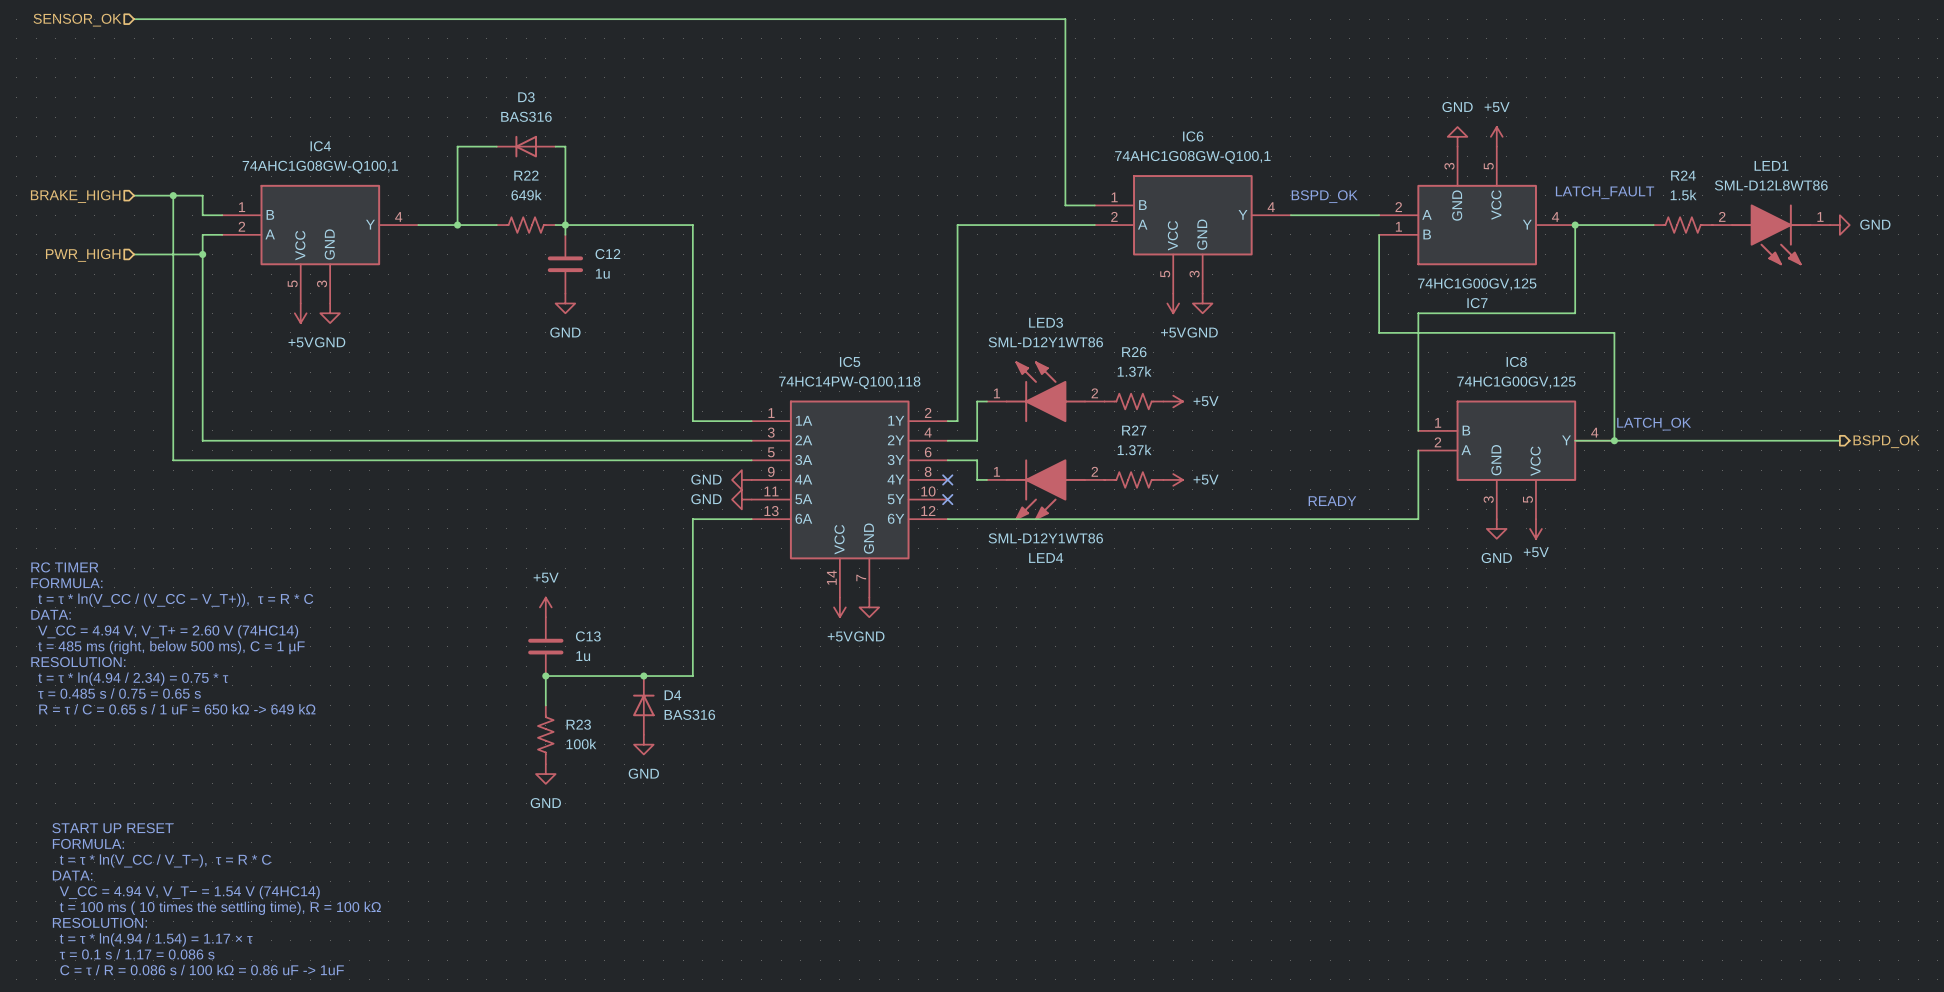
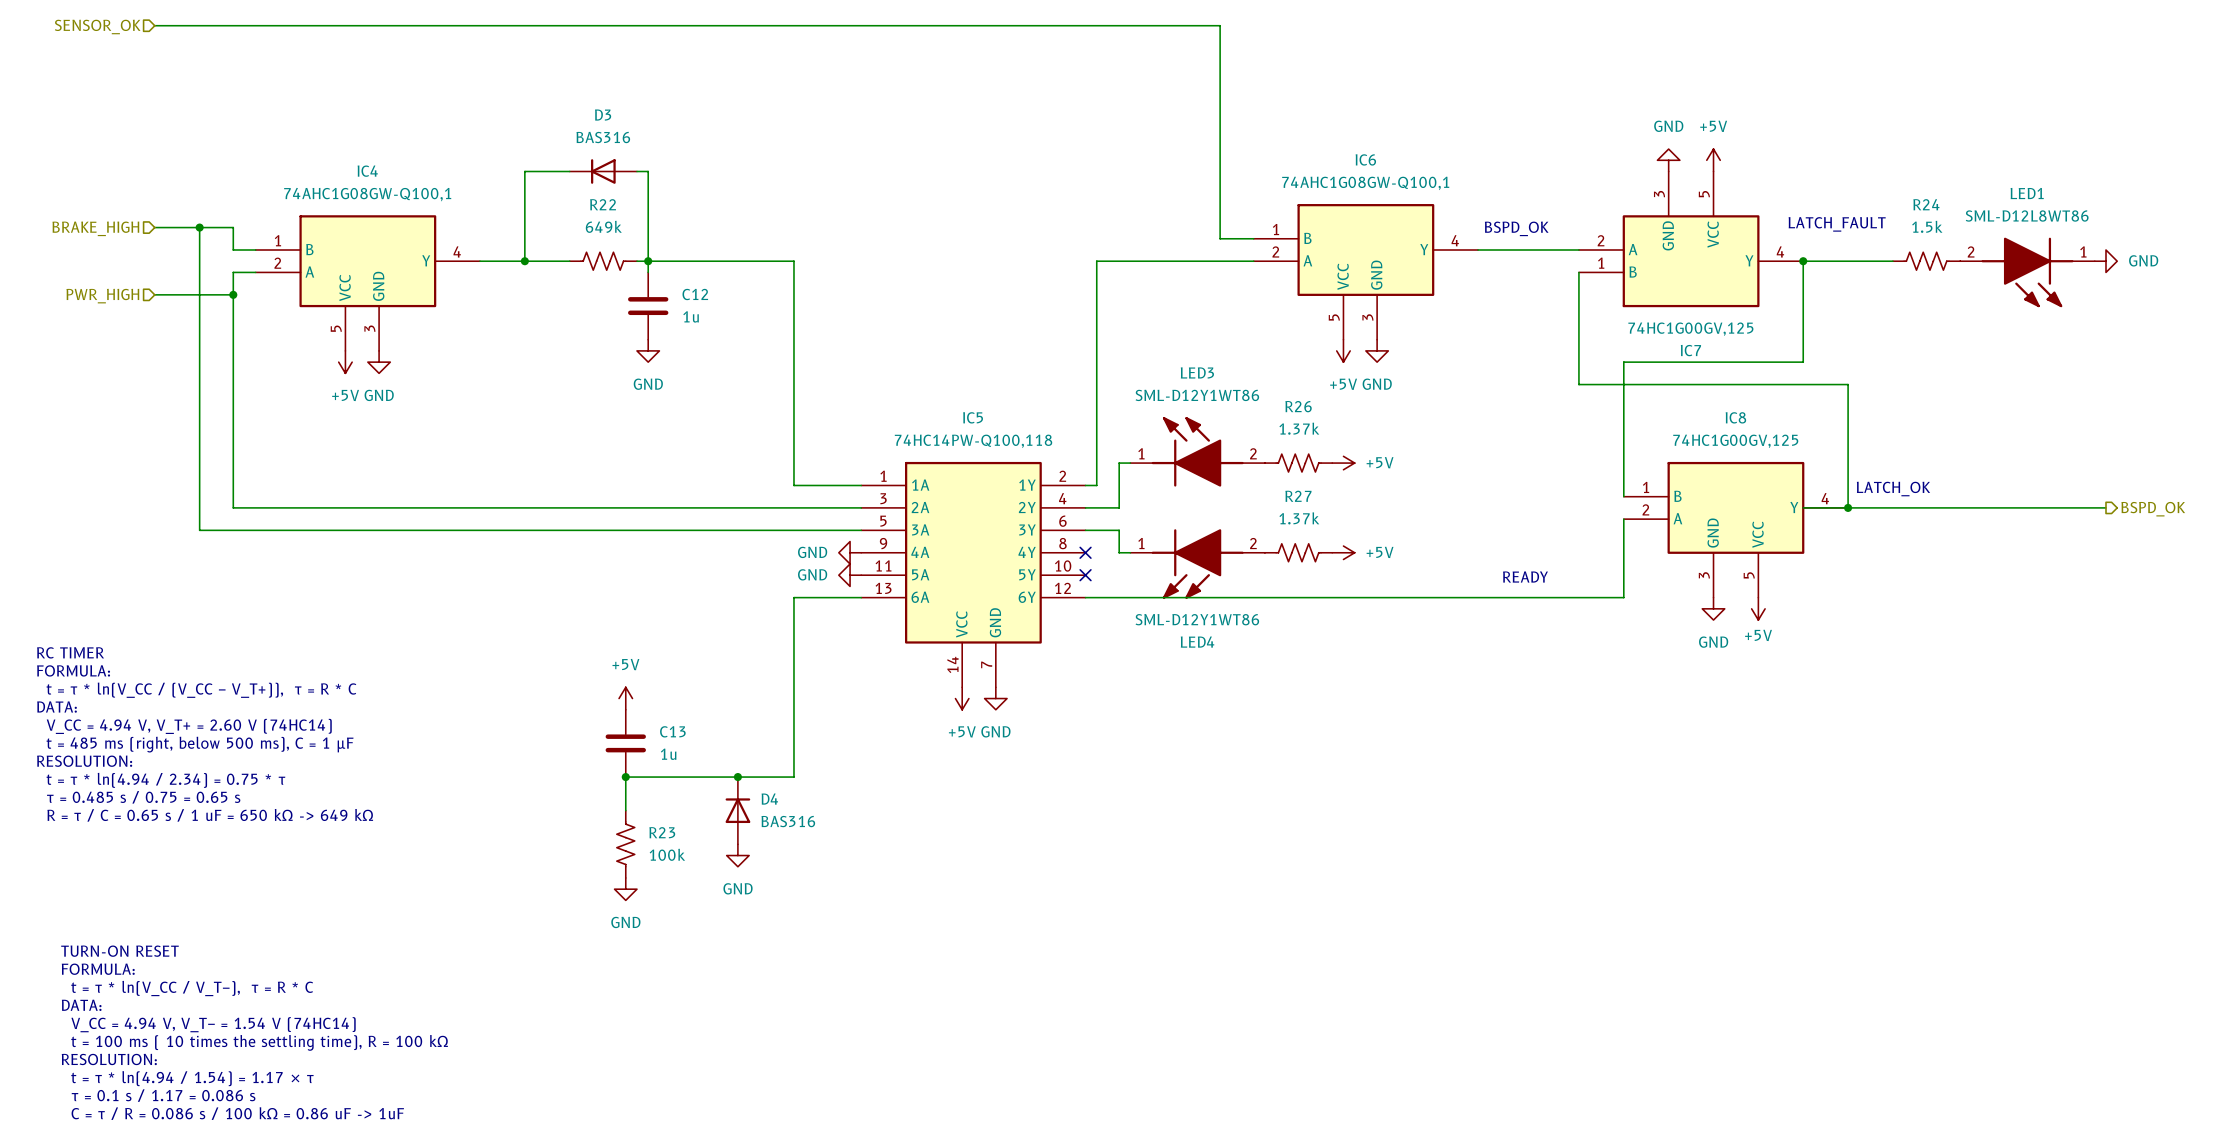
text: START UP RESET (112, 828) -> TURN-ON RESET (119, 951)

